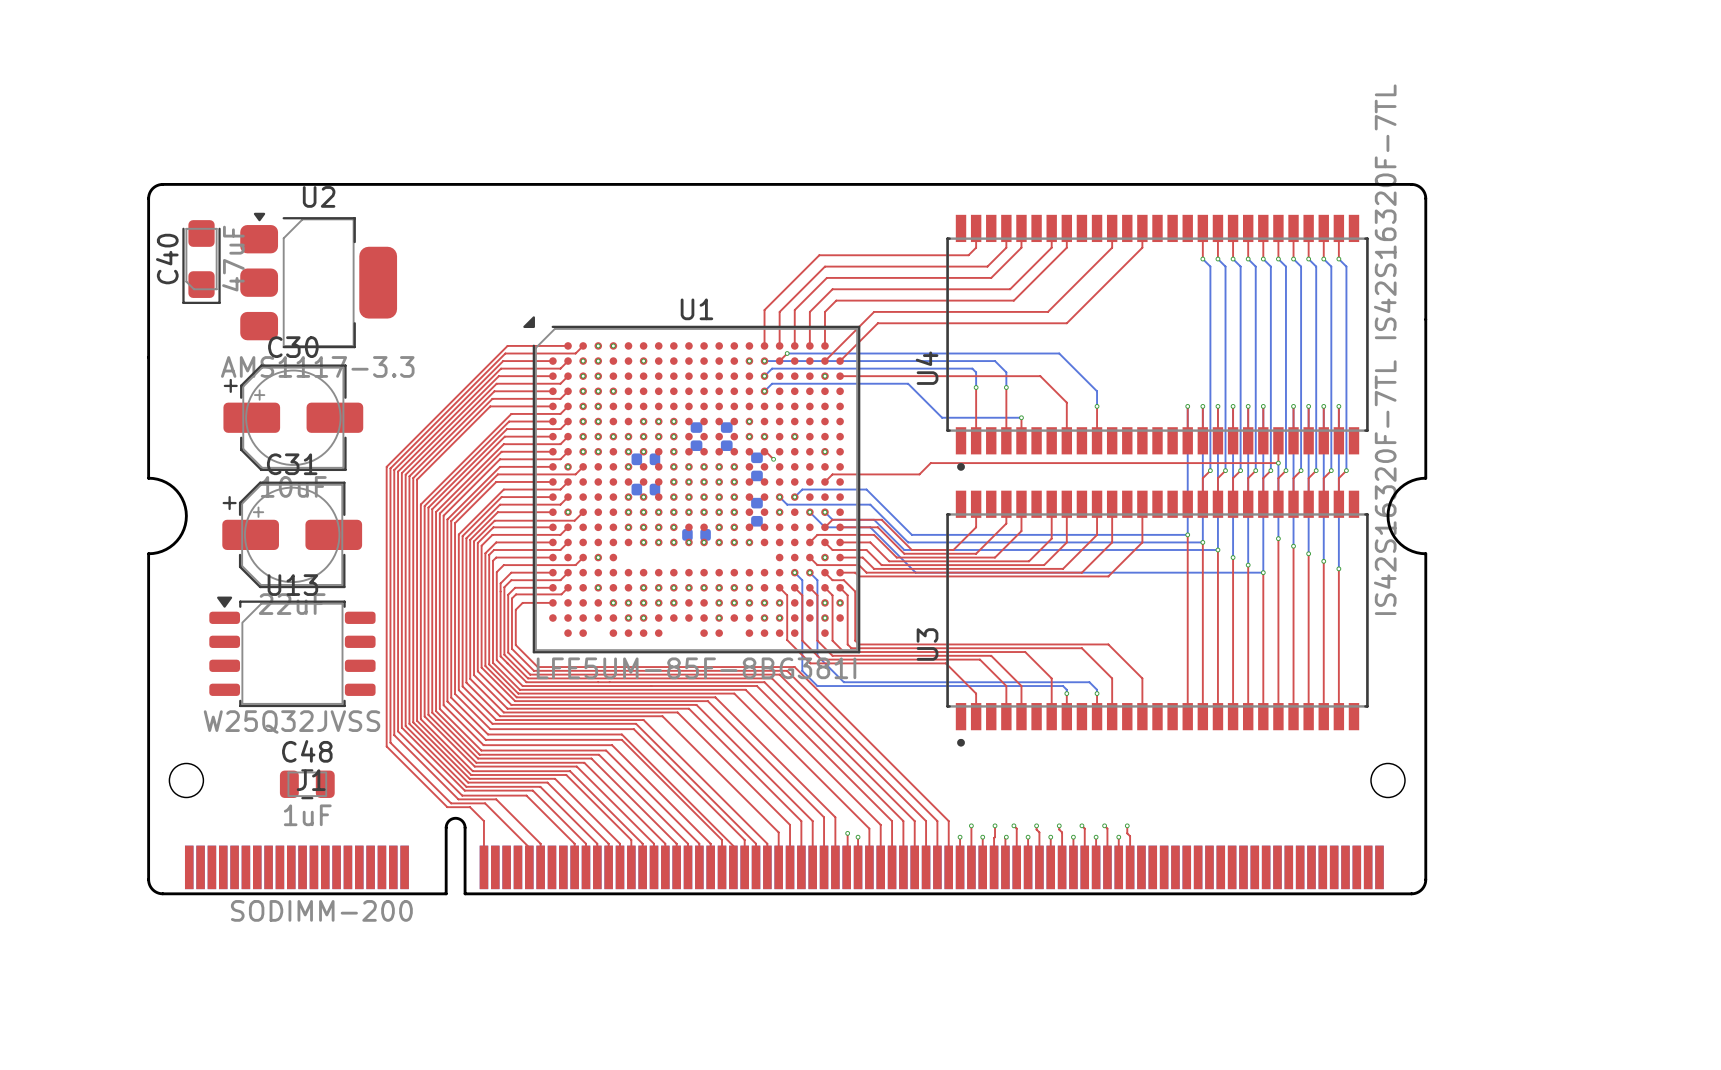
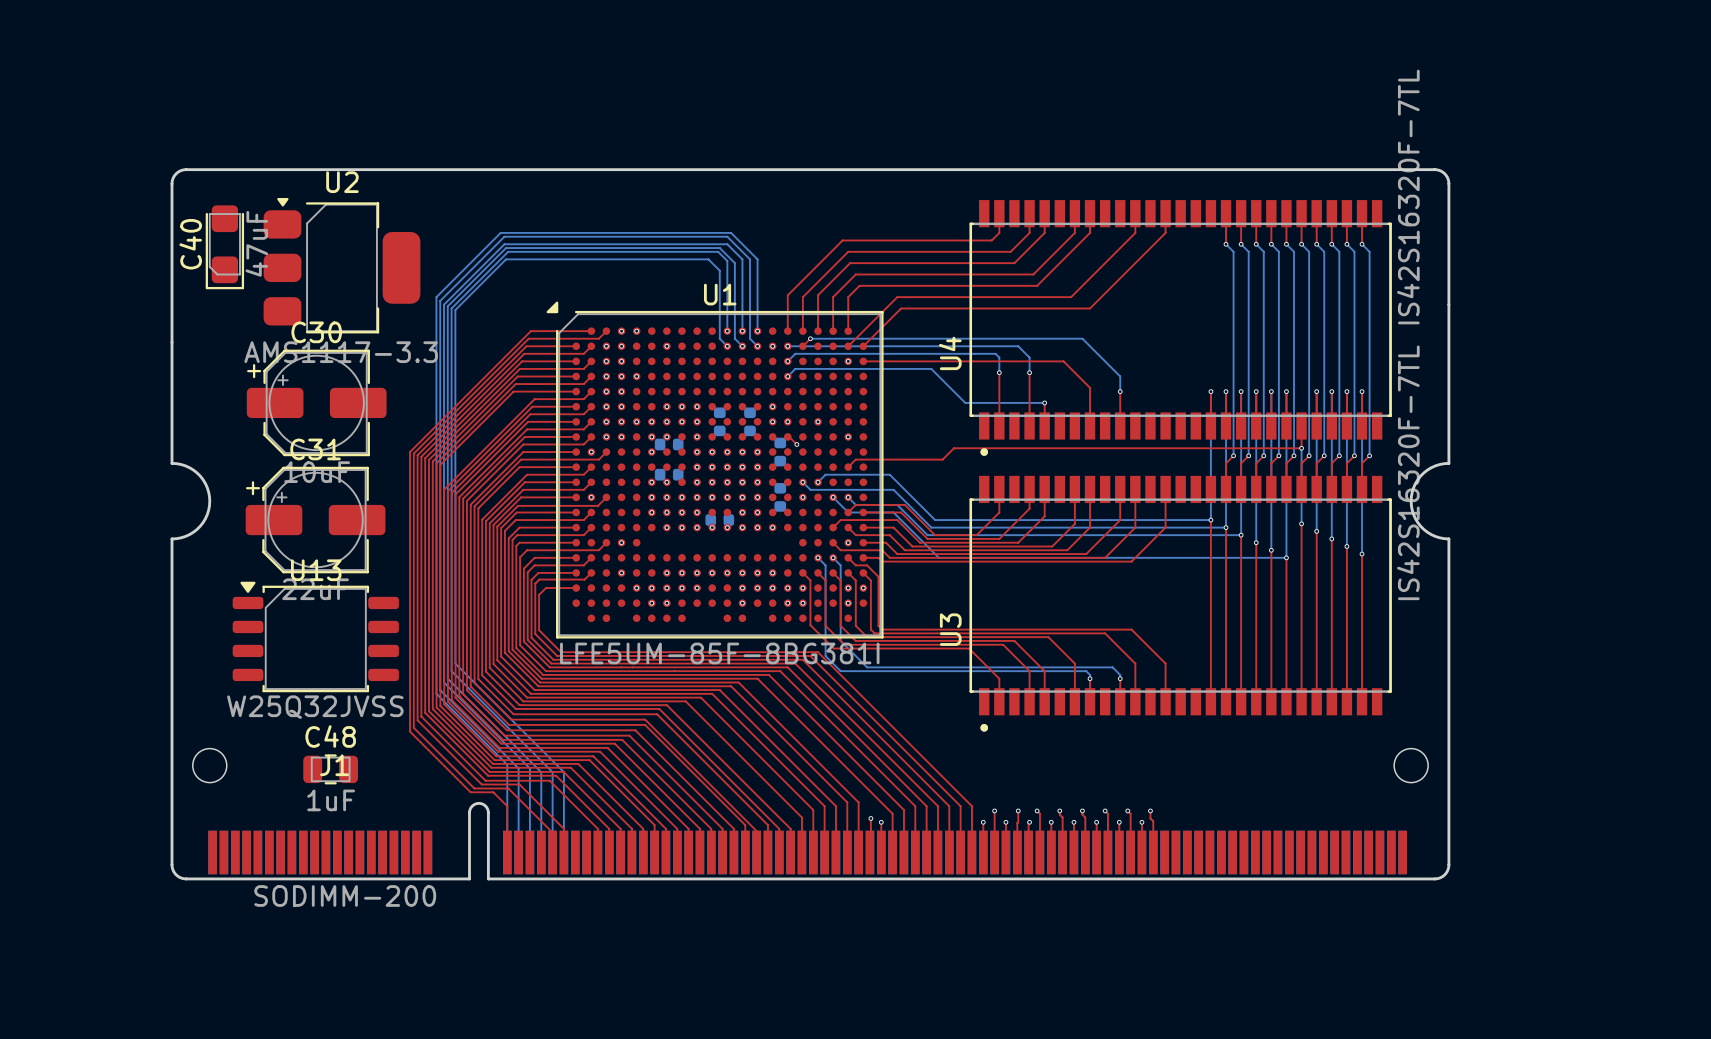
bottom track: none -> (727, 331) (727, 260) (718, 251) (508, 251) (451, 308) (451, 671) (552, 772) (552, 852)
via: none -> (727, 331)
bottom track: none -> (742, 331) (742, 259) (727, 244) (504, 244) (444, 304) (444, 682) (529, 768) (529, 852)
via: none -> (742, 331)
bottom track: none -> (757, 331) (757, 259) (731, 232) (500, 232) (436, 297) (436, 693) (507, 764) (507, 852)
via: none -> (757, 331)
bottom track: none -> (727, 346) (719, 338) (719, 270) (708, 259) (506, 259) (455, 310) (455, 663) (563, 772) (563, 852)
via: none -> (727, 346)
bottom track: none -> (742, 346) (734, 338) (734, 263) (719, 248) (506, 248) (447, 306) (447, 678) (541, 772) (541, 852)
via: none -> (742, 346)
bottom track: none -> (757, 346) (750, 338) (750, 259) (727, 236) (504, 236) (440, 300) (440, 690) (518, 768) (518, 852)
via: none -> (757, 346)

